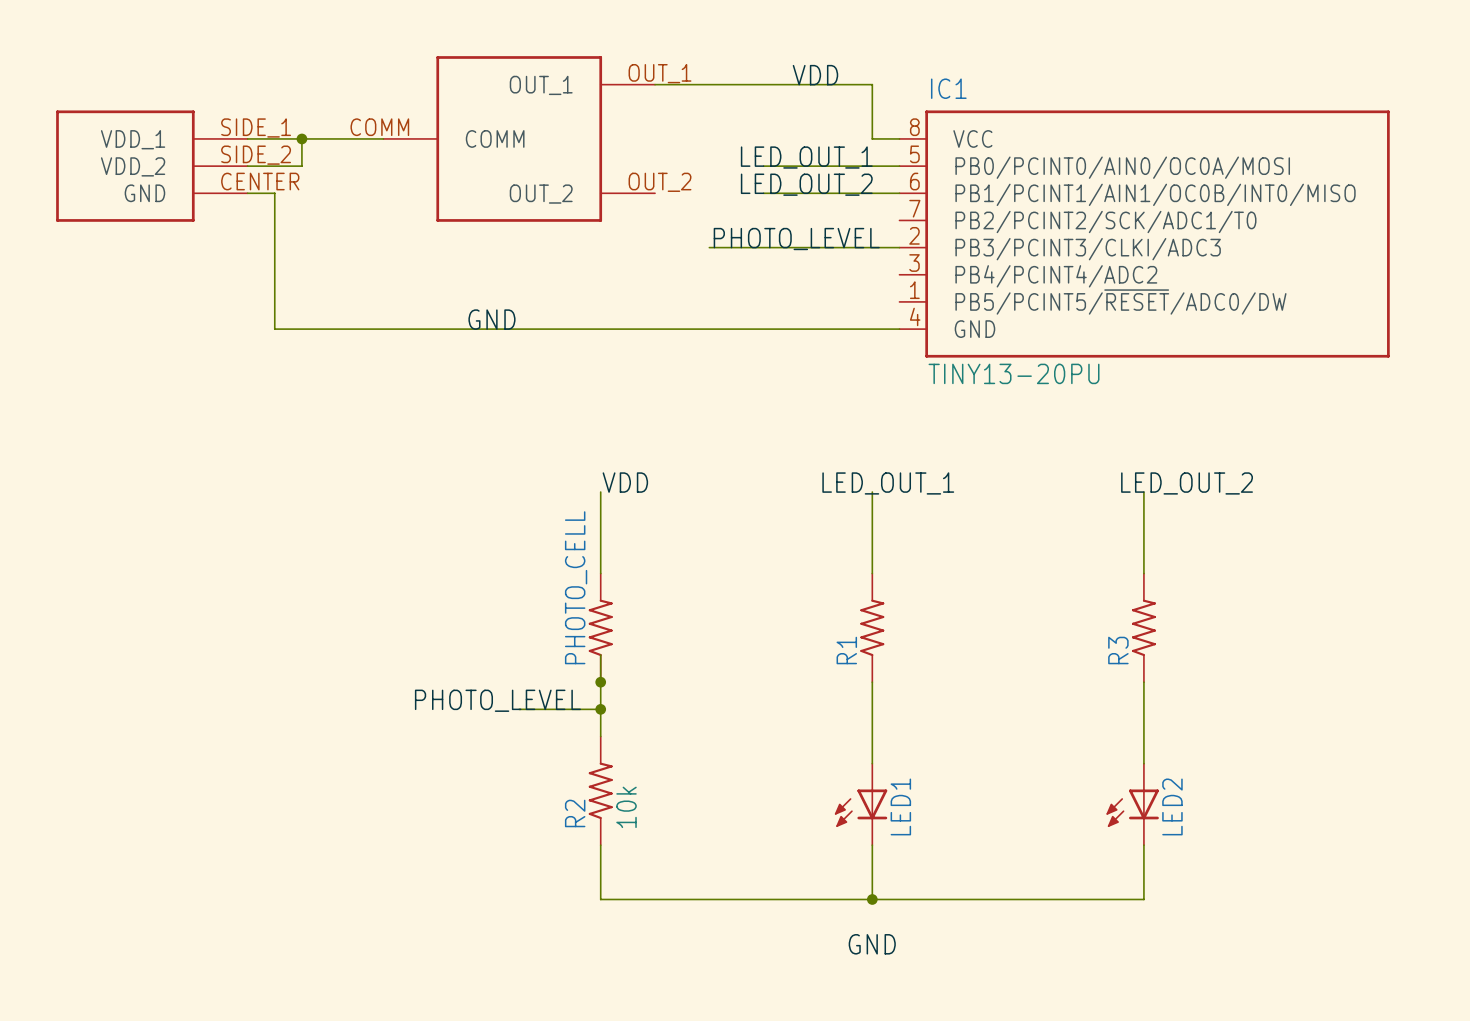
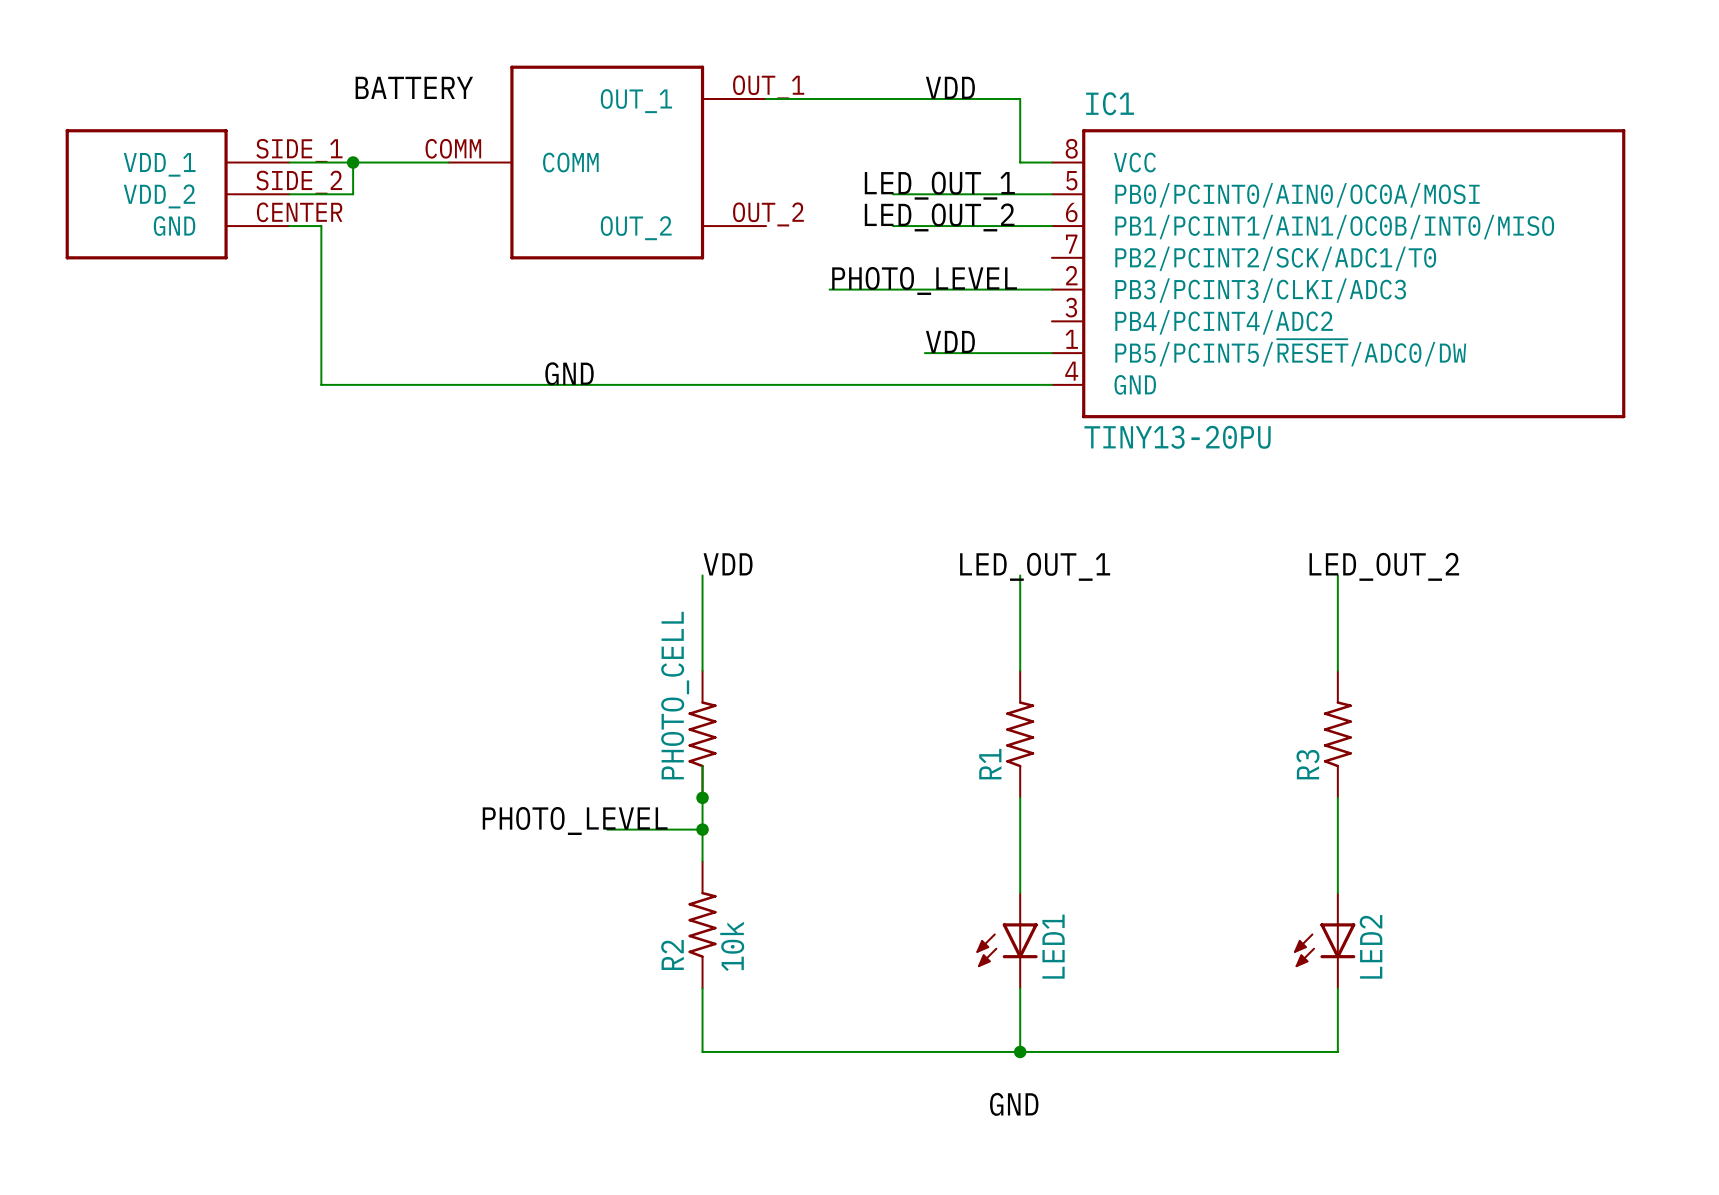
label: none -> BATTERY (414, 87)
label: none -> VDD (950, 342)
wire: none -> (924, 353) (1051, 353)

